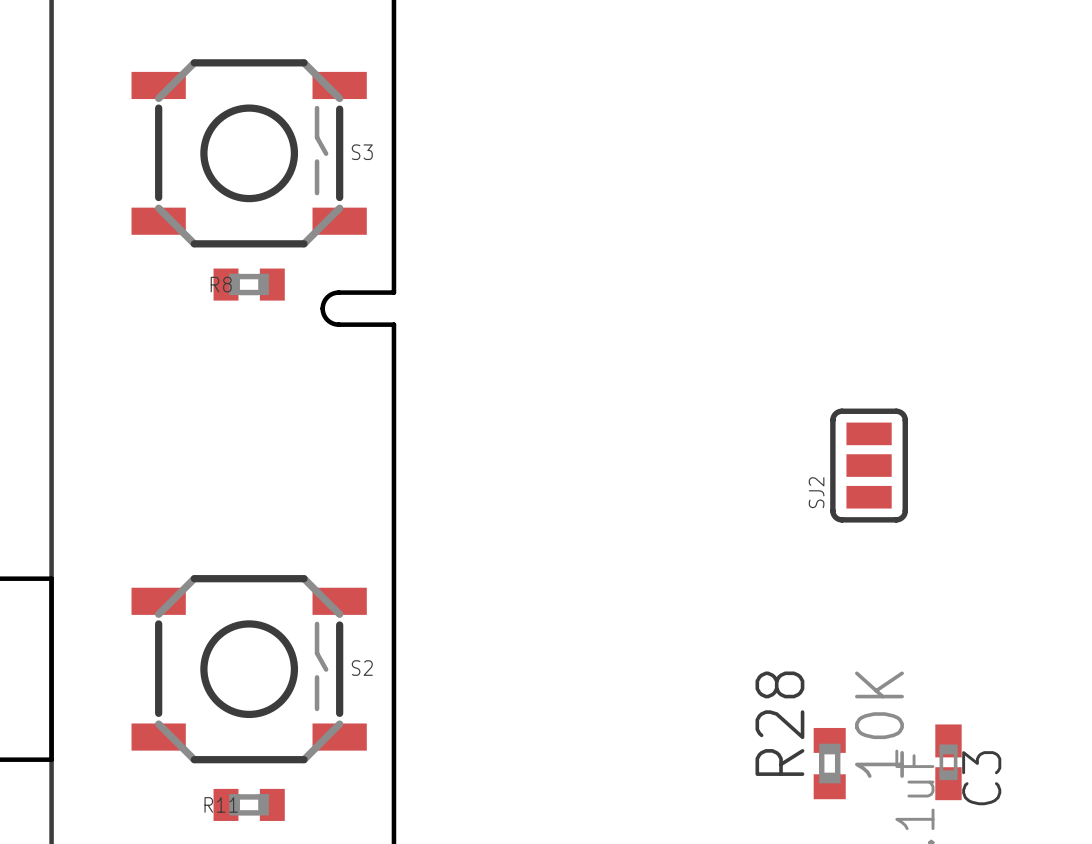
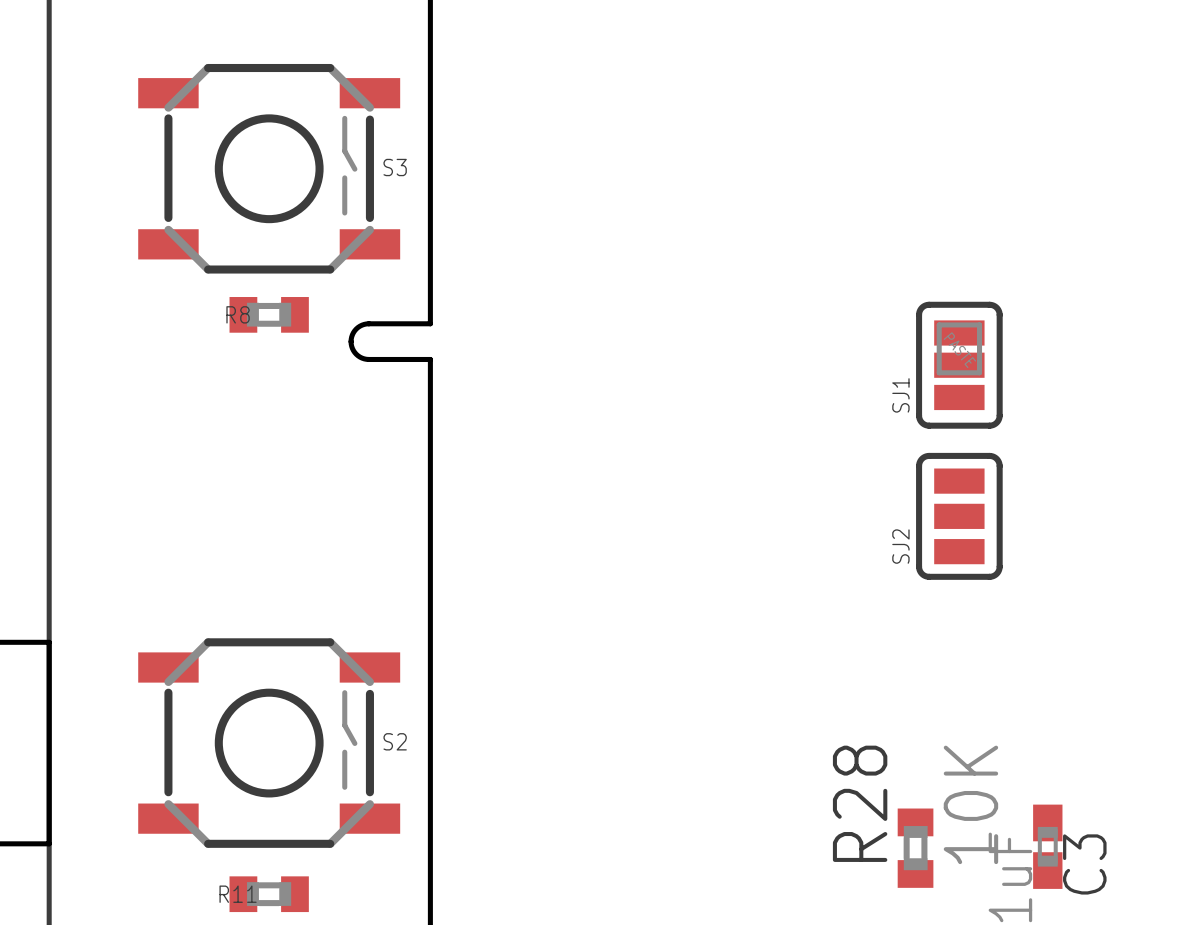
SJ1: none -> (959, 365)

